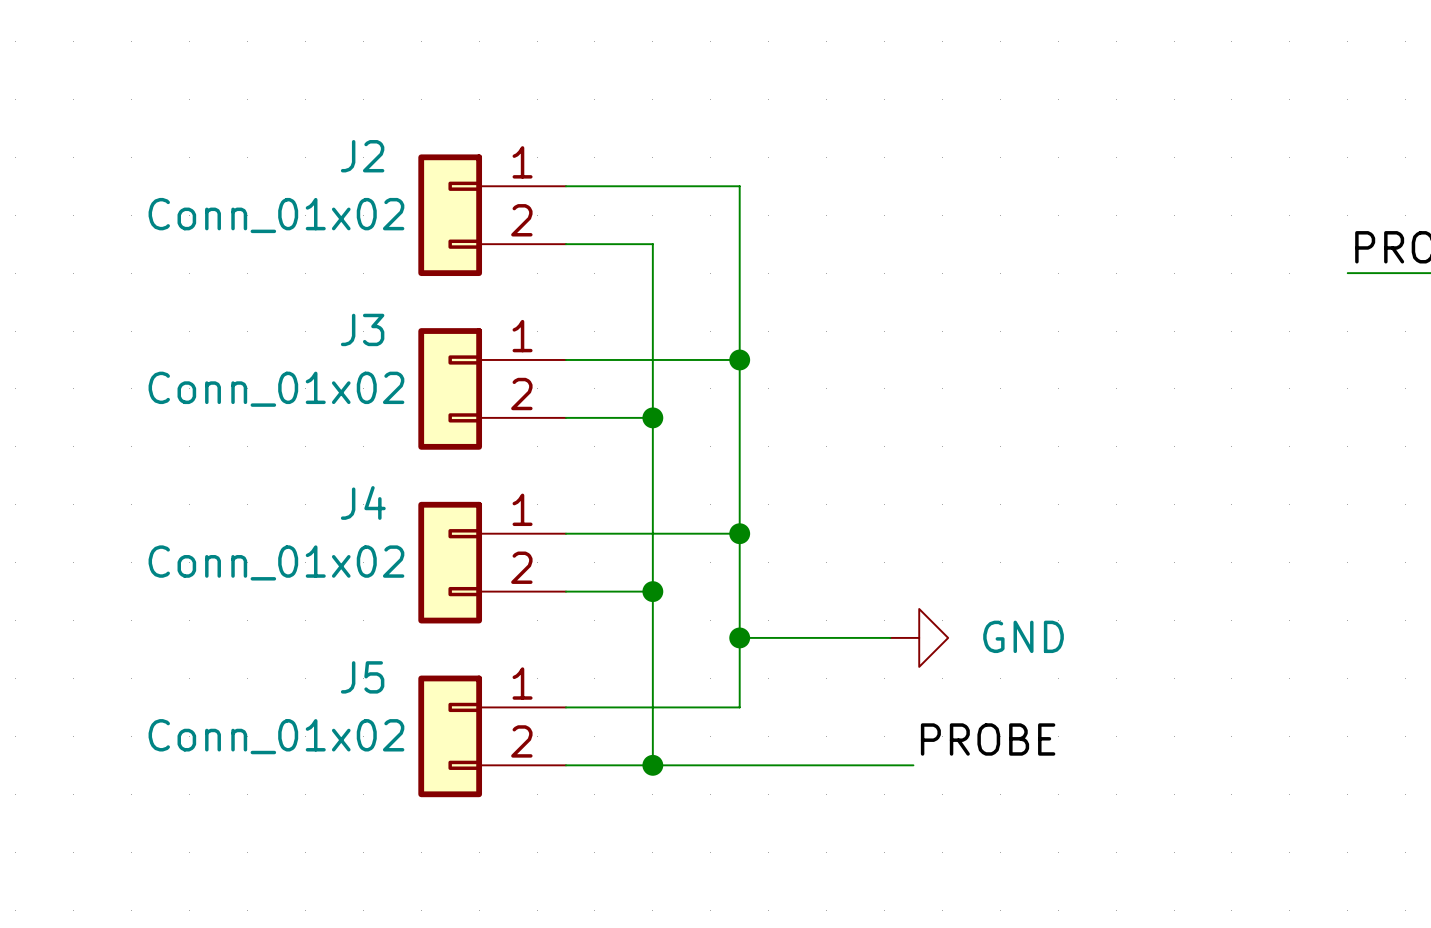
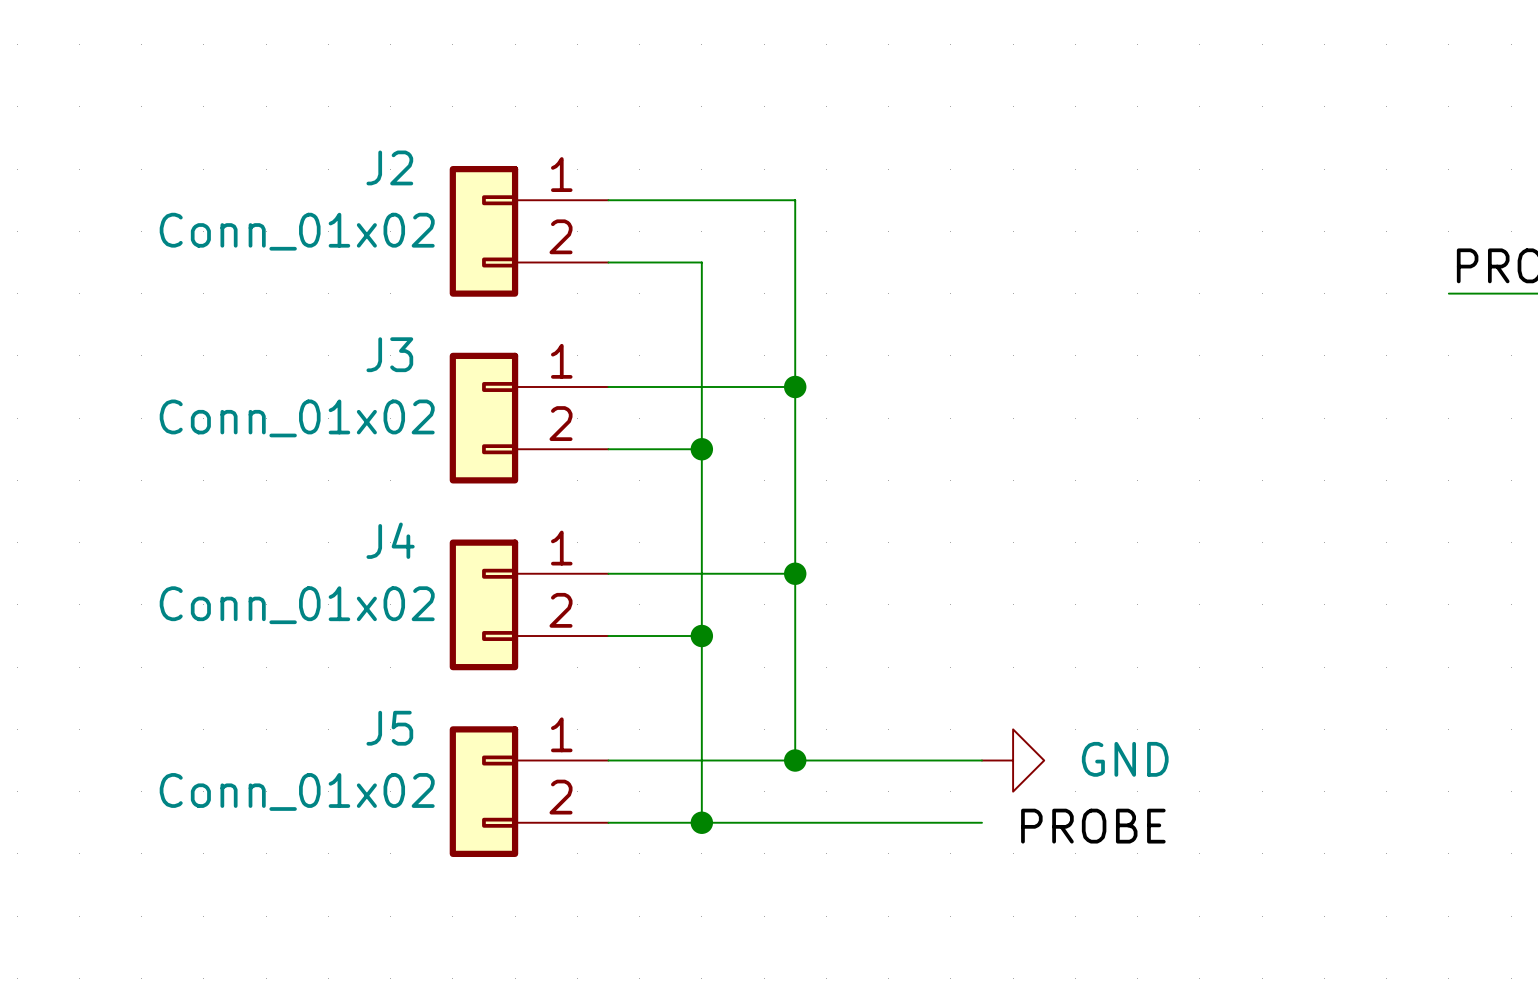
wire: (739, 637) (890, 637) -> none
junction position: (739, 637) -> (795, 760)
power symbol position: GND (919, 637) -> GND (1013, 760)
wire: none -> (795, 760) (981, 760)
label position: PROBE (988, 739) -> PROBE (1093, 826)

